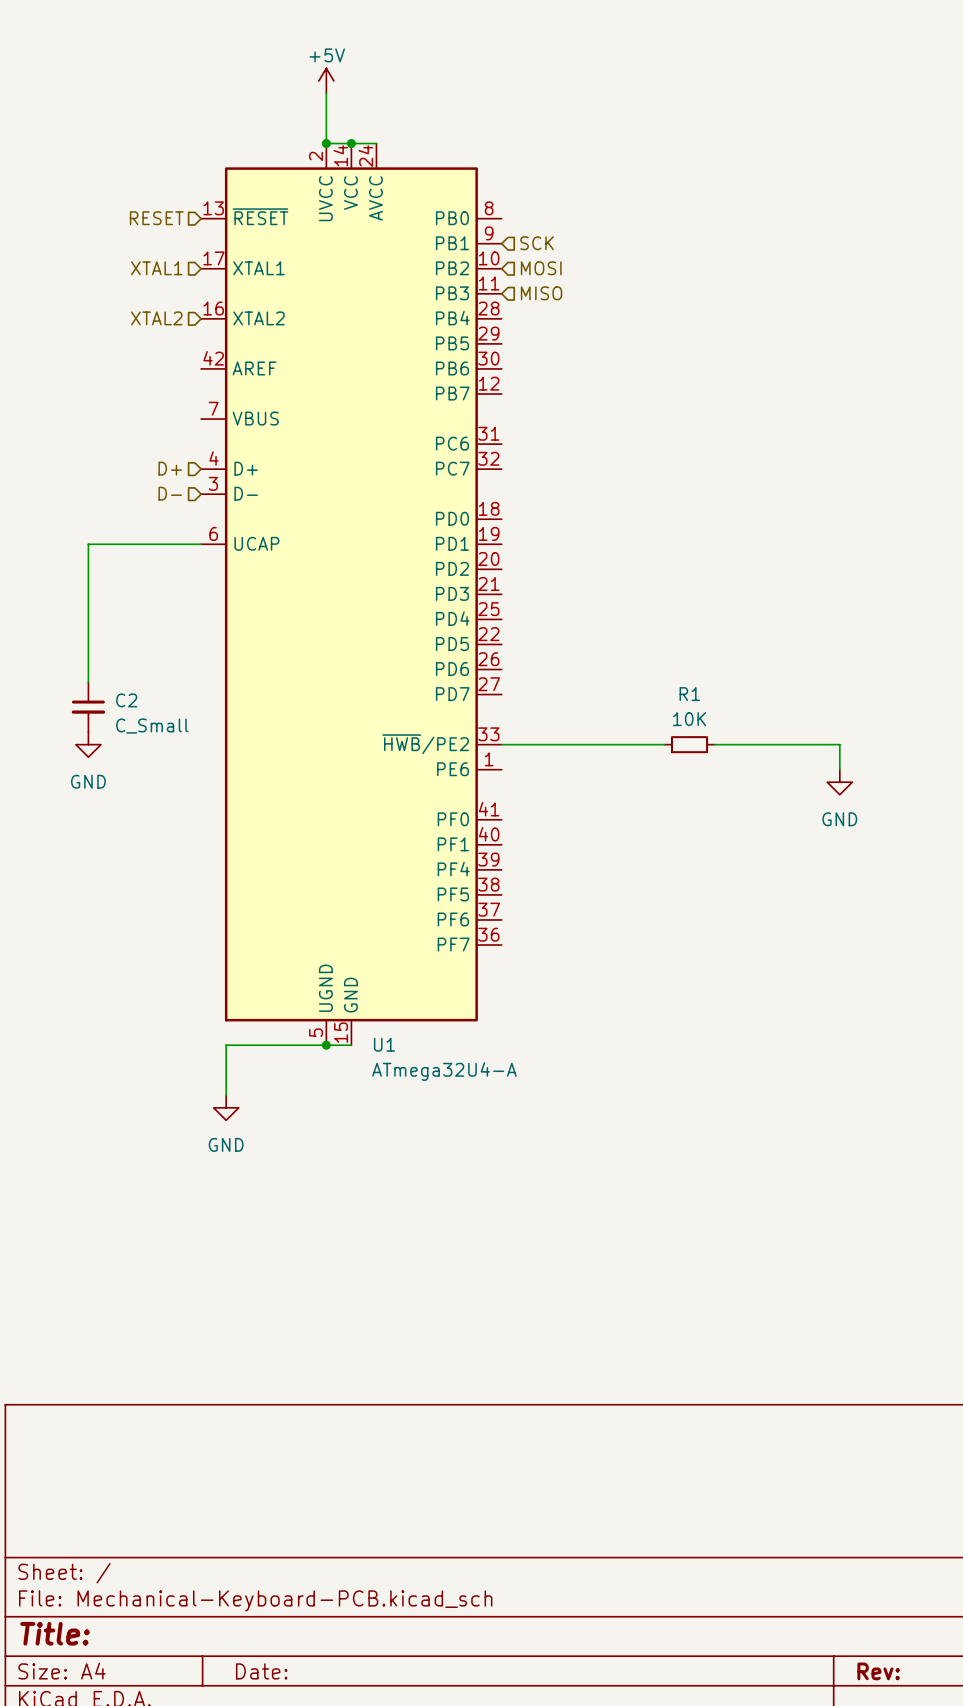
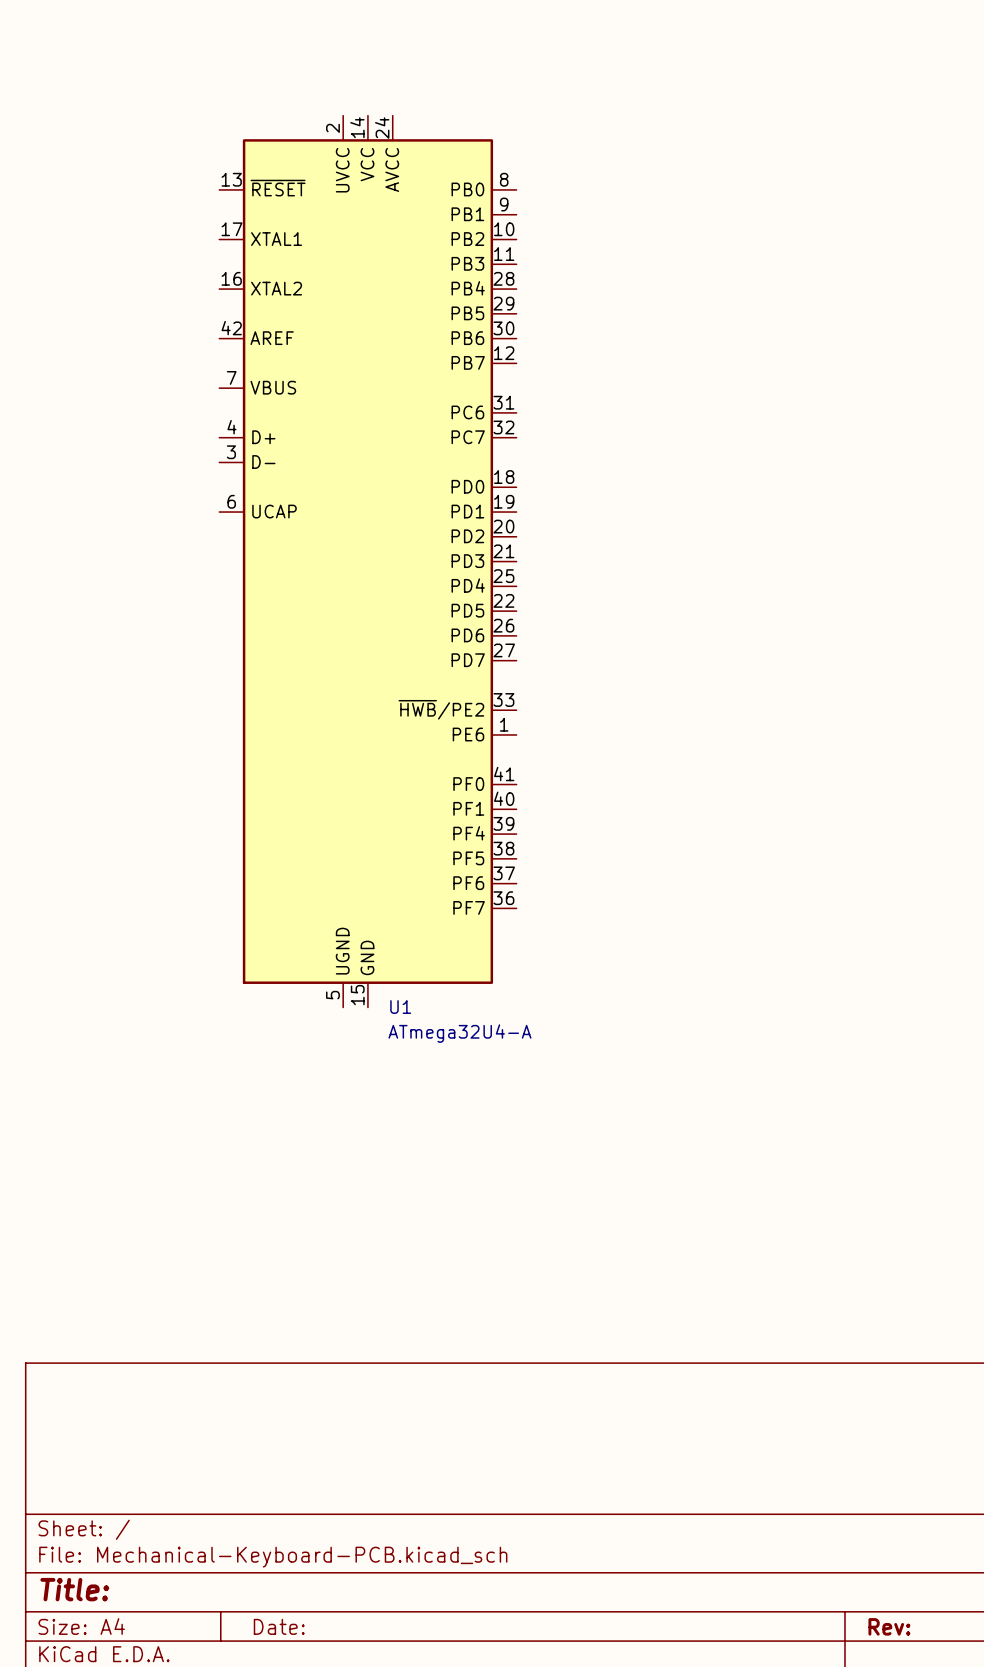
power symbol: +5V (326, 80) -> none
wire: (326, 93) (326, 143) (376, 143) -> none
junction: (326, 143) -> none
junction: (351, 143) -> none
hierarchical label: RESET (156, 218) -> none
hierarchical label: SCK (537, 243) -> none
hierarchical label: XTAL1 (156, 268) -> none
hierarchical label: MOSI (541, 268) -> none
hierarchical label: MISO (541, 293) -> none
hierarchical label: XTAL2 (156, 318) -> none
hierarchical label: D+ (170, 468) -> none
hierarchical label: D- (170, 493) -> none
wire: (201, 544) (88, 544) (88, 682) -> none
C2: C_Small (88, 707) -> none
power symbol: GND (88, 744) -> none
wire: (501, 744) (664, 744) -> none
R1: 10K (689, 744) -> none
wire: (714, 744) (839, 744) (839, 769) -> none
power symbol: GND (839, 782) -> none
junction: (326, 1045) -> none
wire: (351, 1045) (226, 1045) (226, 1095) -> none
power symbol: GND (226, 1107) -> none

